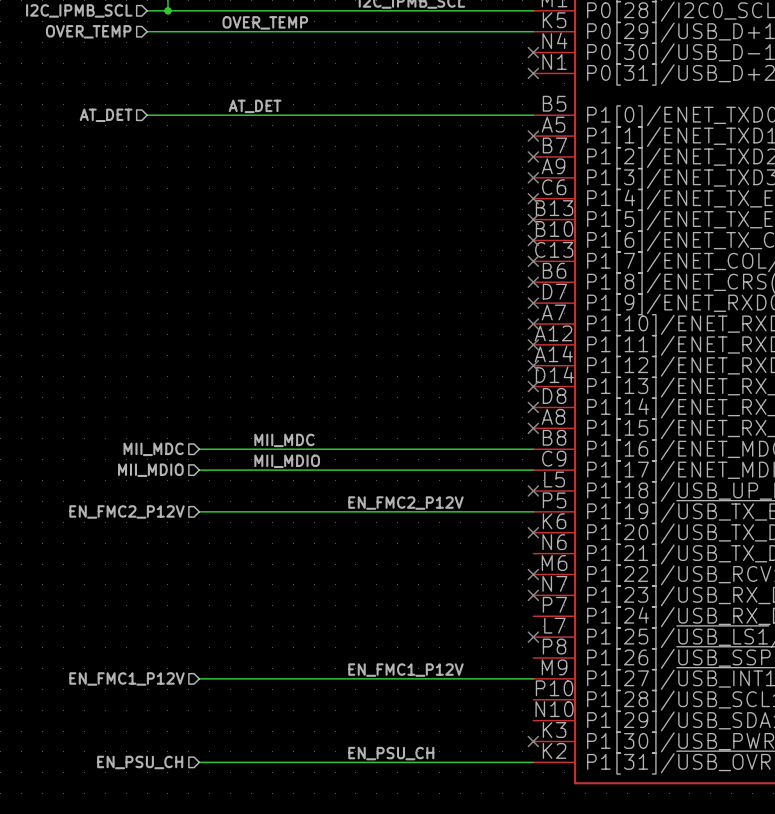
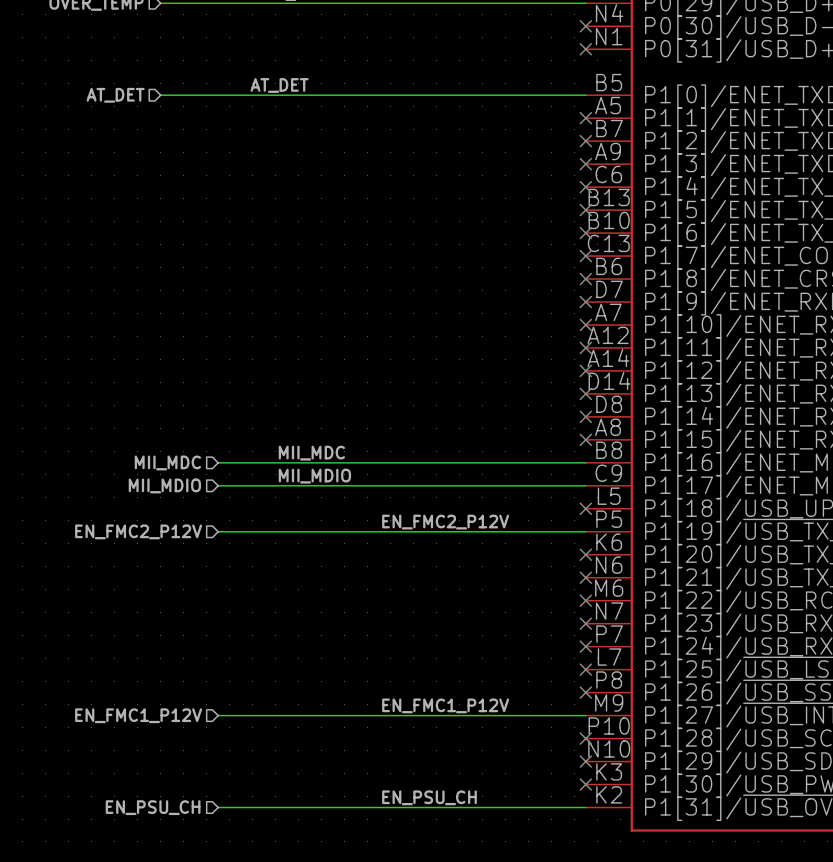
no-connect mark: none -> (585, 577)
no-connect mark: none -> (585, 646)
no-connect mark: none -> (585, 692)
no-connect mark: none -> (585, 738)
no-connect mark: none -> (585, 761)

